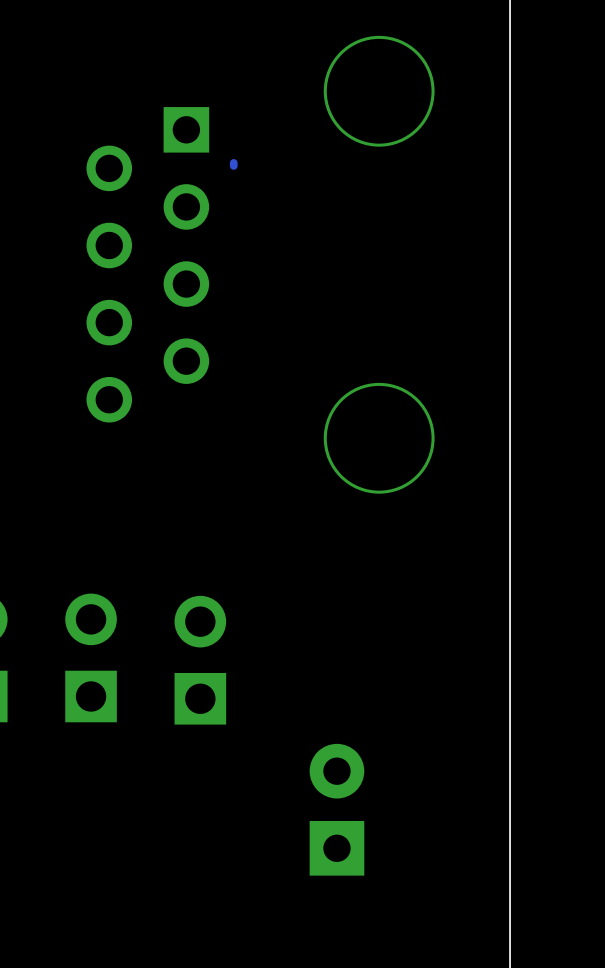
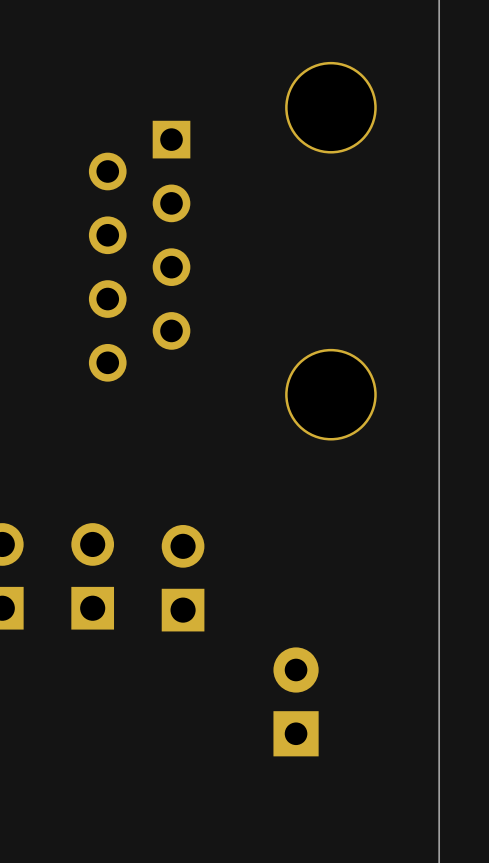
track: (233, 162) (233, 165) -> none

